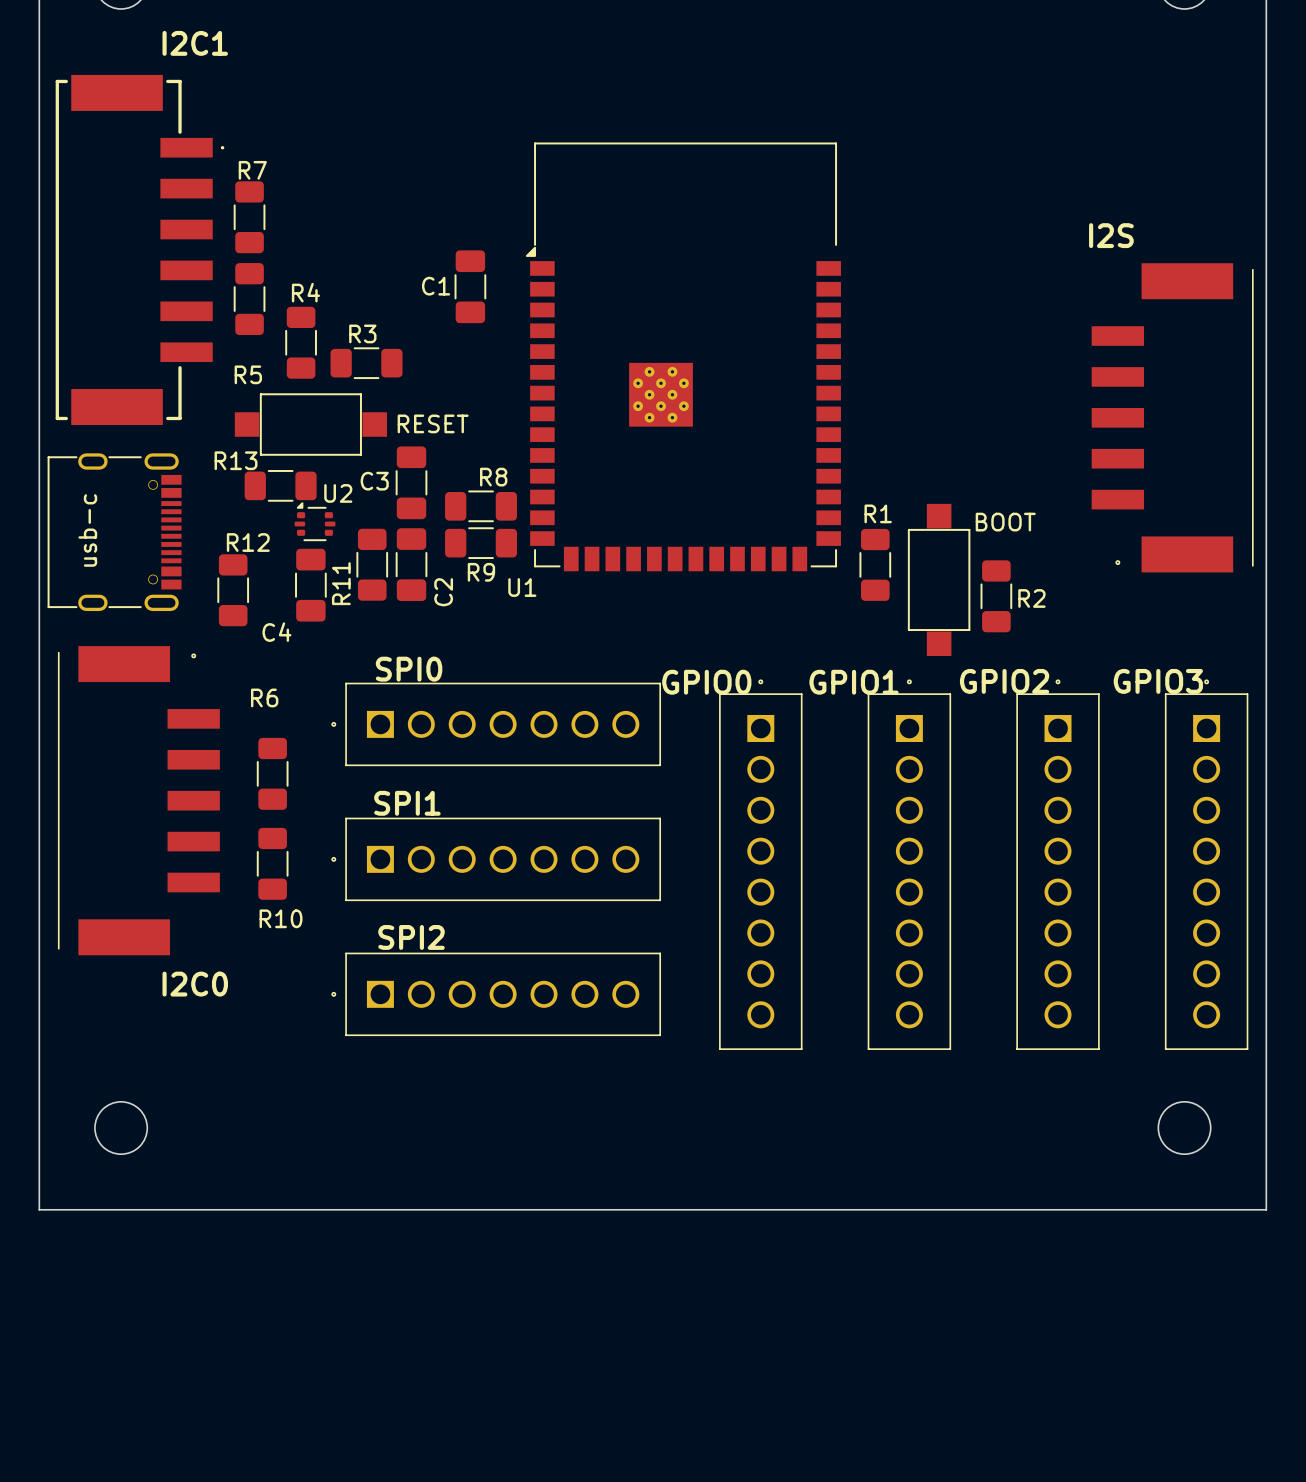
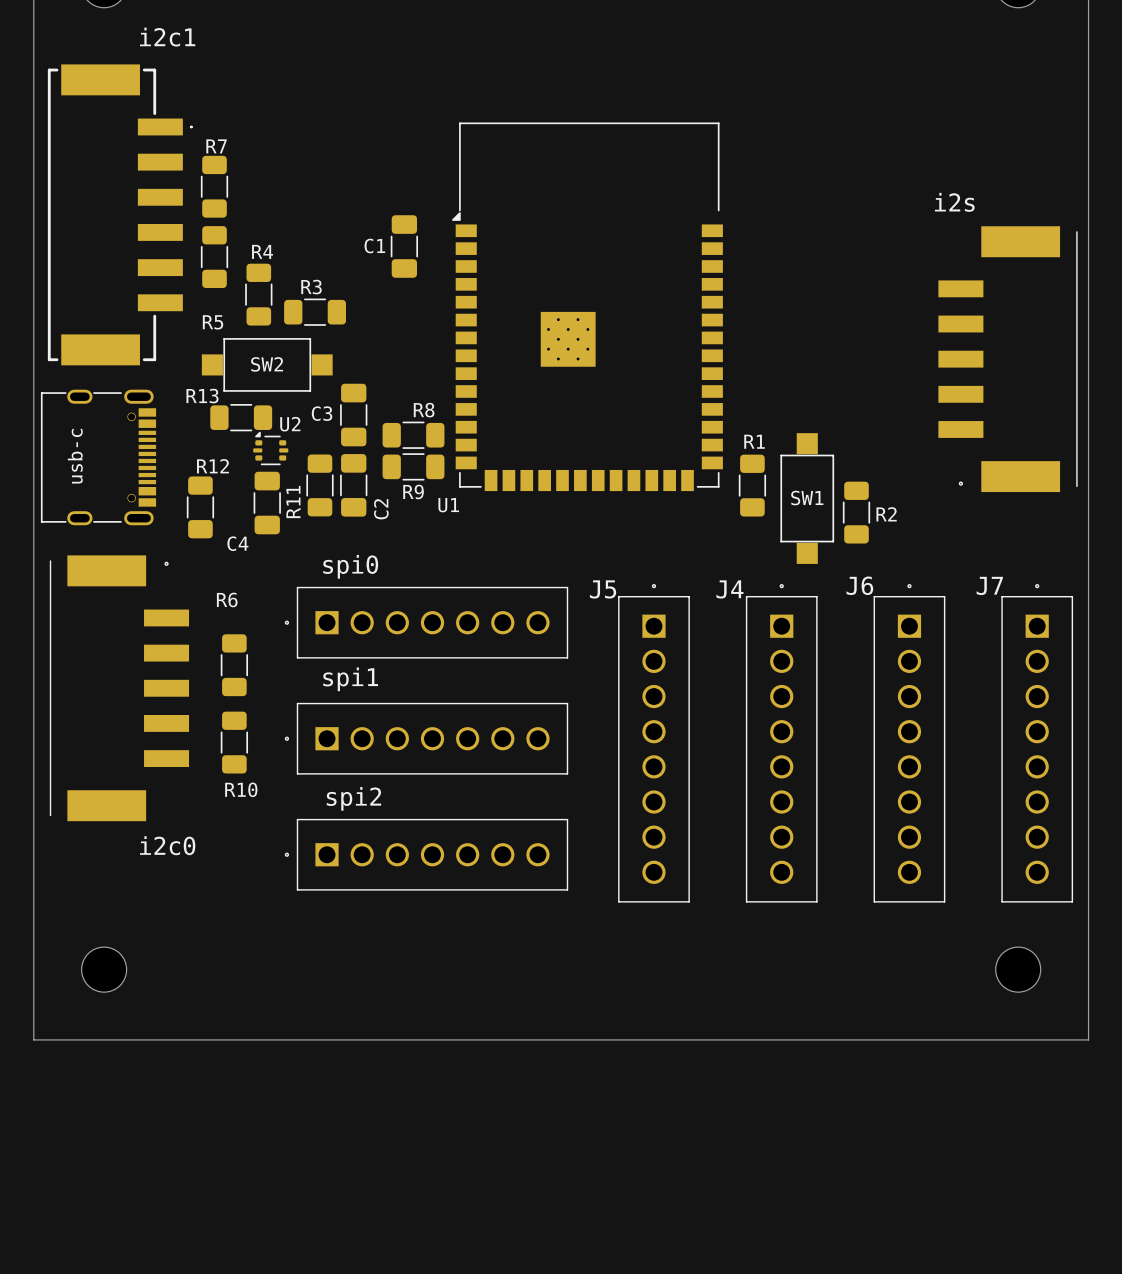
I2C1 name: I2C1 (195, 43) -> i2c1 (167, 37)
I2S name: I2S (1111, 235) -> i2s (954, 202)
RESET name: RESET (433, 423) -> SW2 (267, 364)
BOOT name: BOOT (1005, 522) -> SW1 (807, 498)
SPI0 name: SPI0 (409, 669) -> spi0 (350, 566)
GPIO2 name: GPIO2 (1004, 681) -> J6 (859, 585)
GPIO3 name: GPIO3 (1158, 681) -> J7 (989, 585)
GPIO0 name: GPIO0 (706, 682) -> J5 (603, 589)
GPIO1 name: GPIO1 (854, 682) -> J4 (729, 589)
SPI1 name: SPI1 (407, 803) -> spi1 (350, 679)
SPI2 name: SPI2 (411, 937) -> spi2 (353, 798)
I2C0 name: I2C0 (195, 984) -> i2c0 (167, 845)

